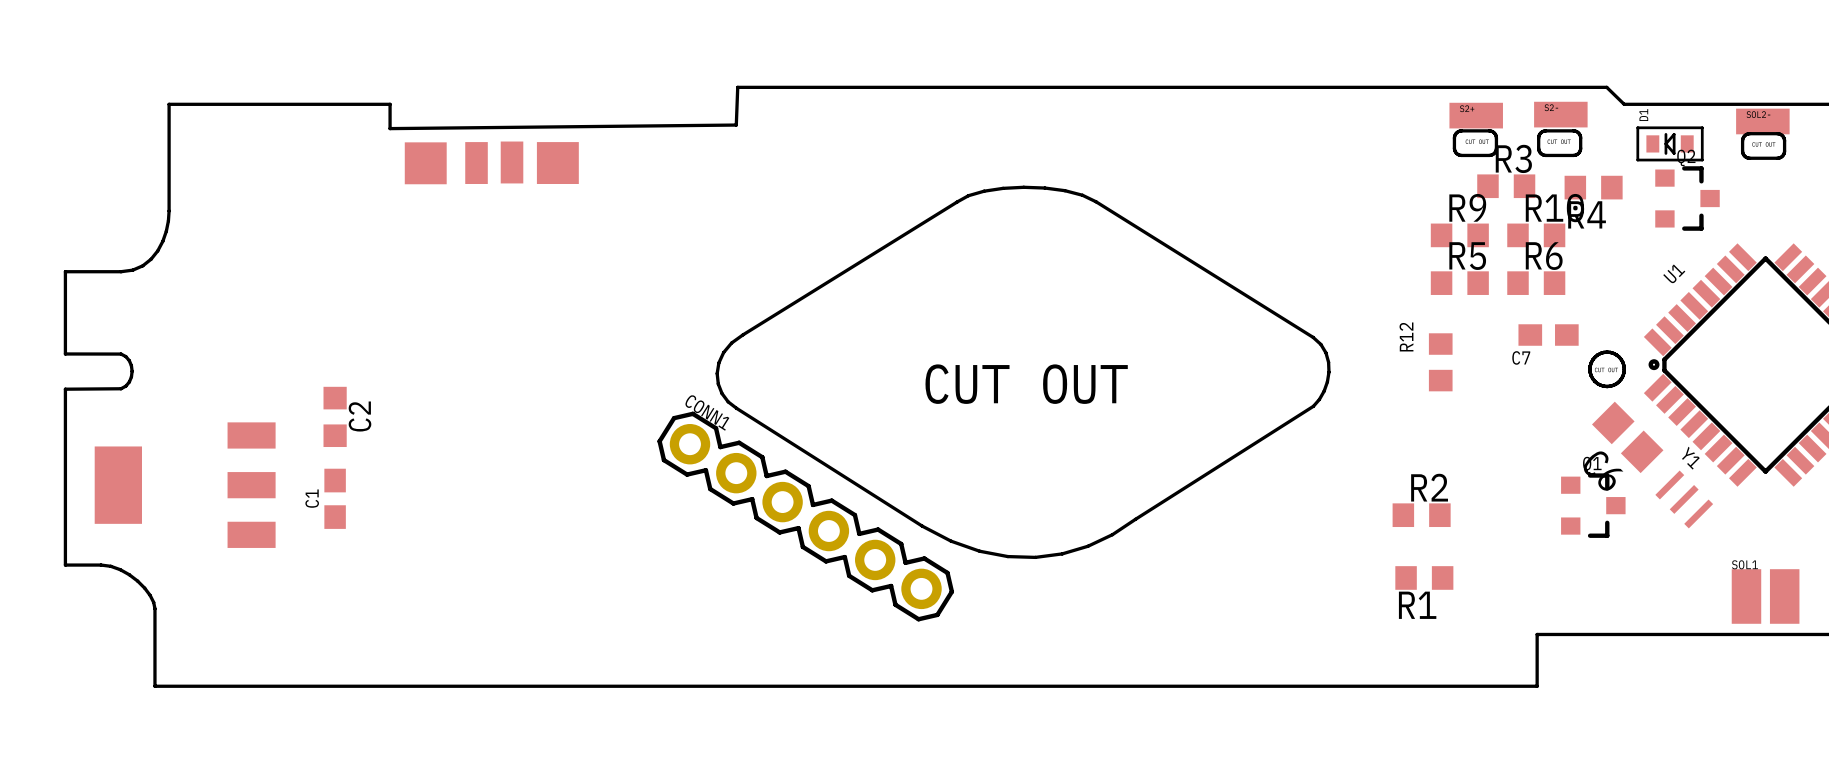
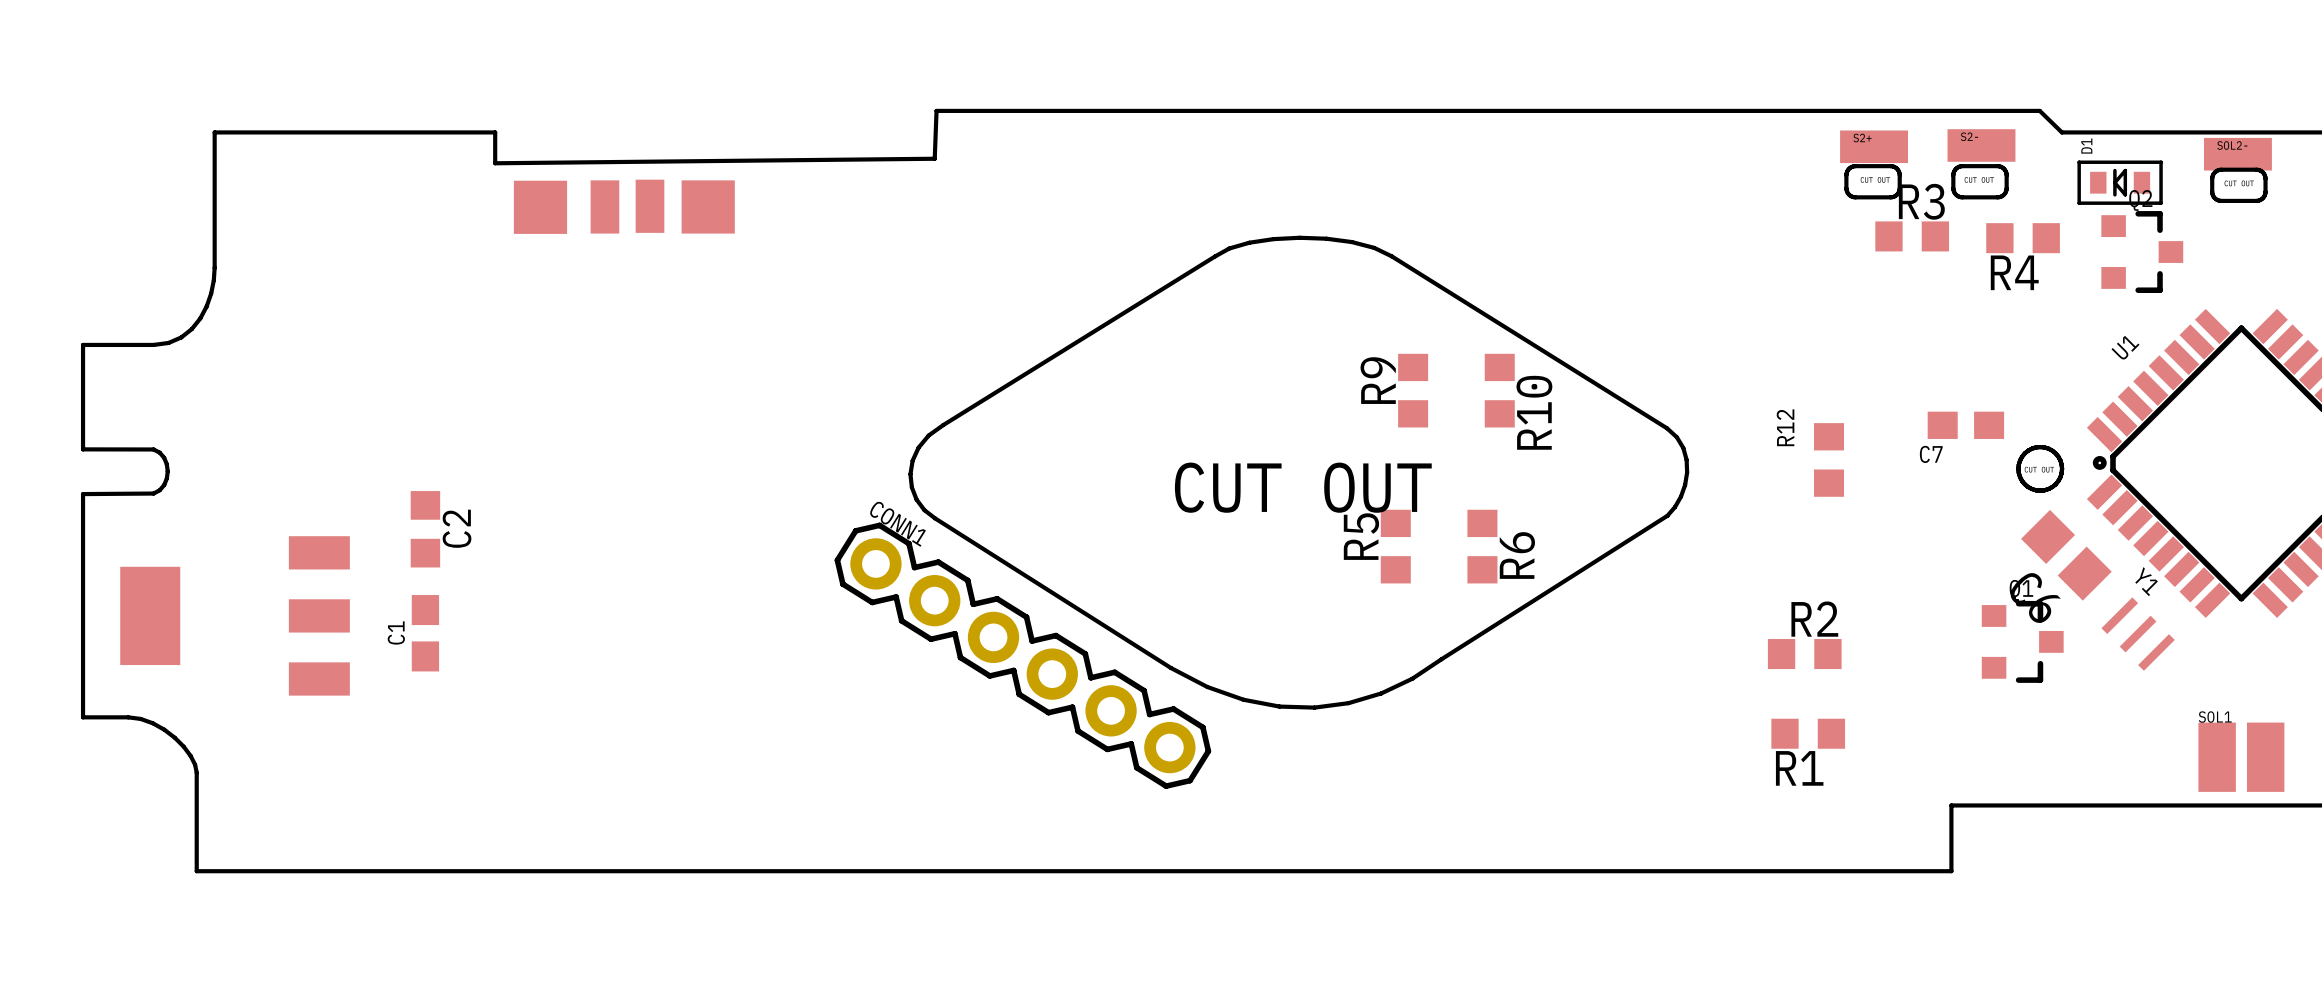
R9 name position: R9 (1467, 207) -> R9 (1378, 380)
R9 rotation: 0° (1459, 235) -> 90° clockwise (1413, 390)
R9 position: (1459, 235) -> (1413, 390)
R10 rotation: 0° (1536, 235) -> 90° clockwise (1499, 390)
R10 position: (1536, 235) -> (1499, 390)
R5 name position: R5 (1467, 256) -> R5 (1361, 536)
R5 rotation: 0° (1459, 283) -> 90° clockwise (1395, 546)
R5 position: (1459, 283) -> (1395, 546)
R6 rotation: 0° (1536, 283) -> 90° clockwise (1482, 546)
R6 position: (1536, 283) -> (1482, 546)

